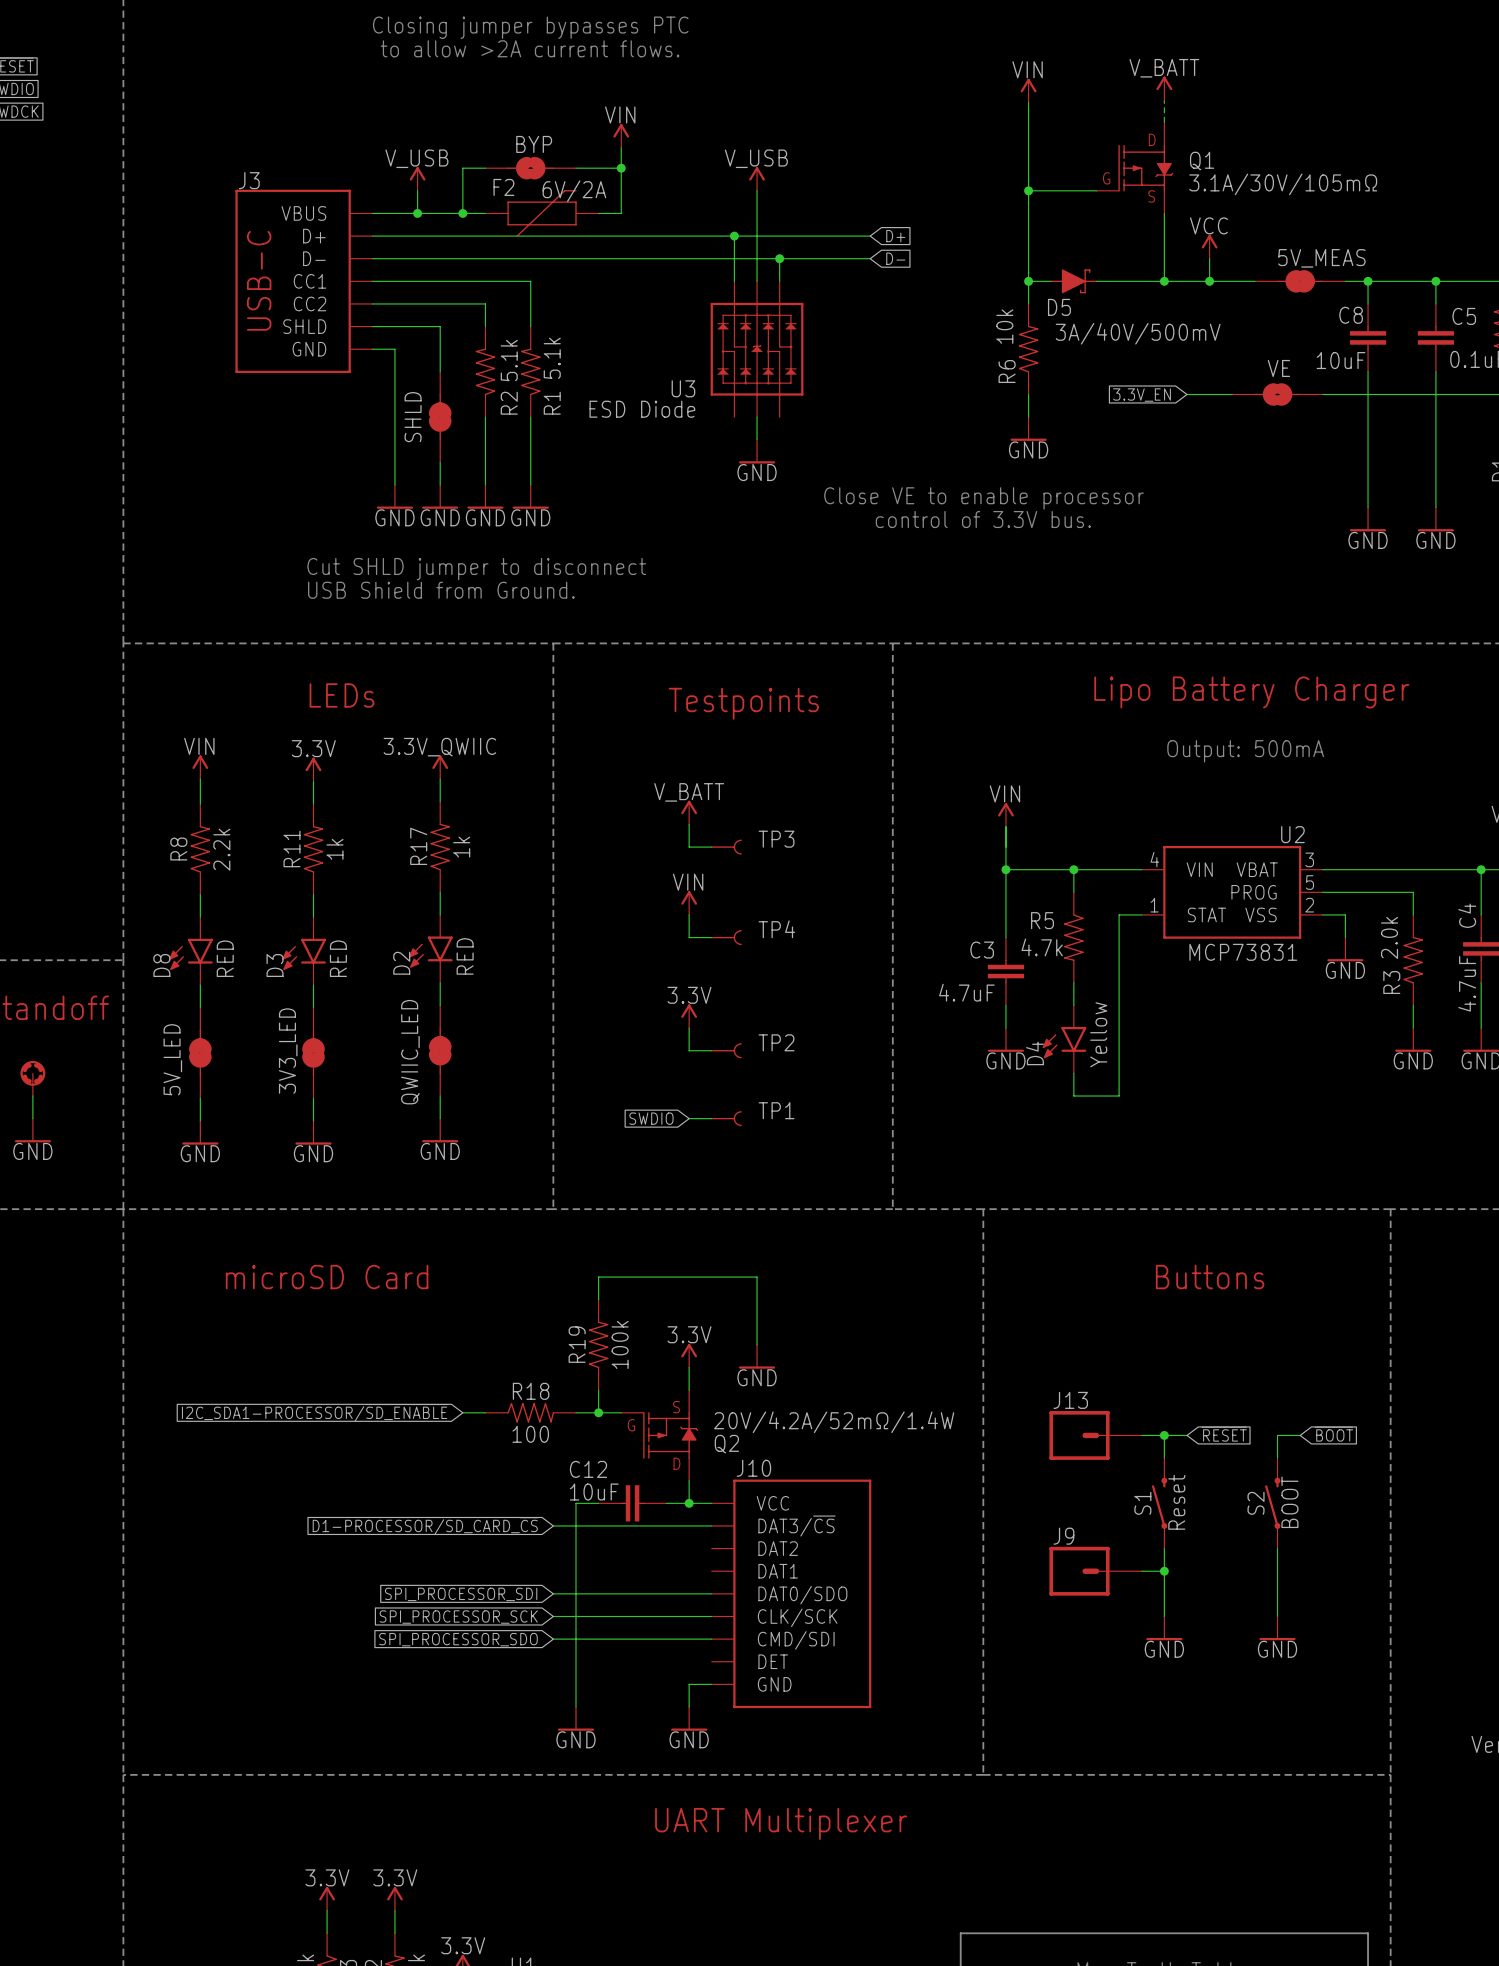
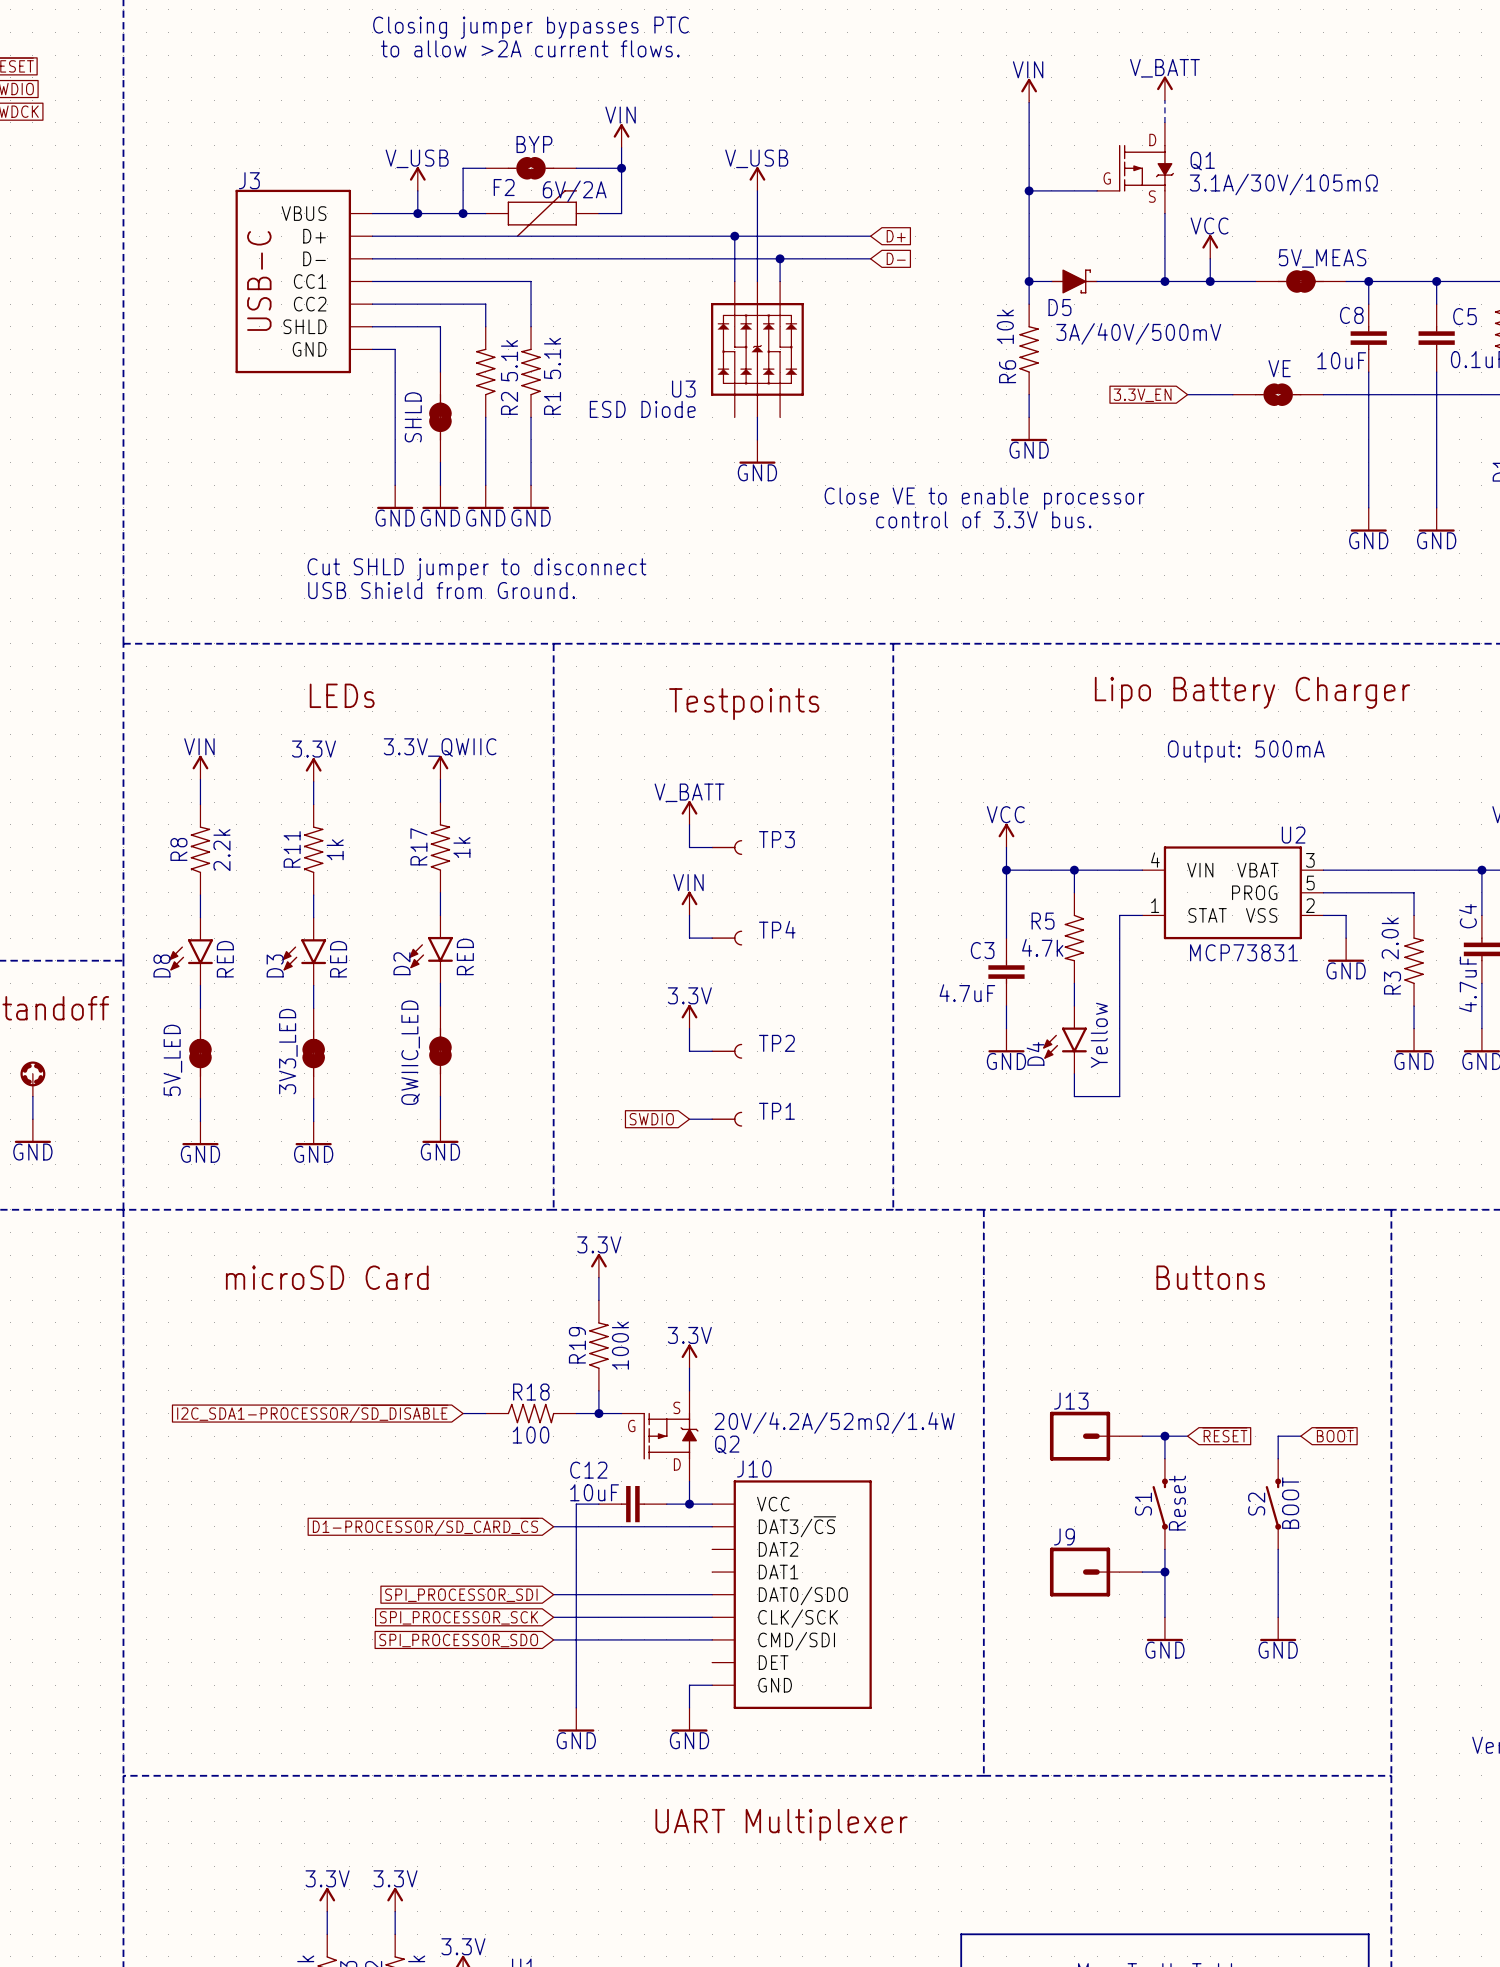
power symbol: VIN (1005, 814) -> none
power symbol: none -> VCC (1006, 835)
power symbol: none -> 3.3V (598, 1265)
wire: (598, 1277) (757, 1277) (757, 1344) -> none
power symbol: GND (757, 1356) -> none
global label: I2C_SDA1-PROCESSOR/~{SD_ENABLE} (315, 1412) -> I2C_SDA1-PROCESSOR/~{SD_DISABLE} (312, 1413)

